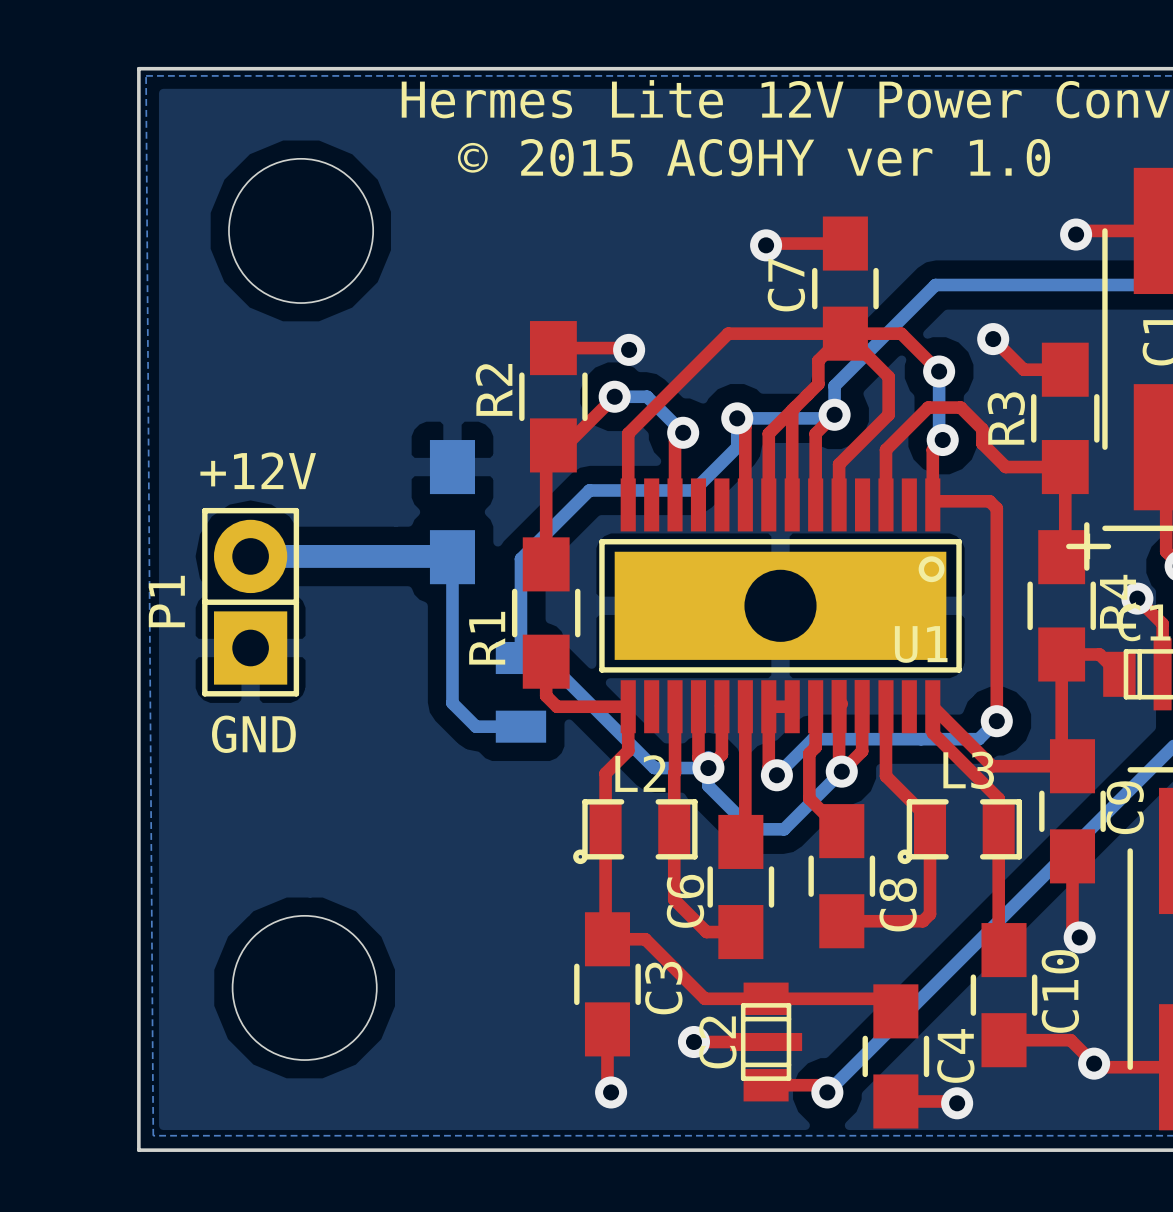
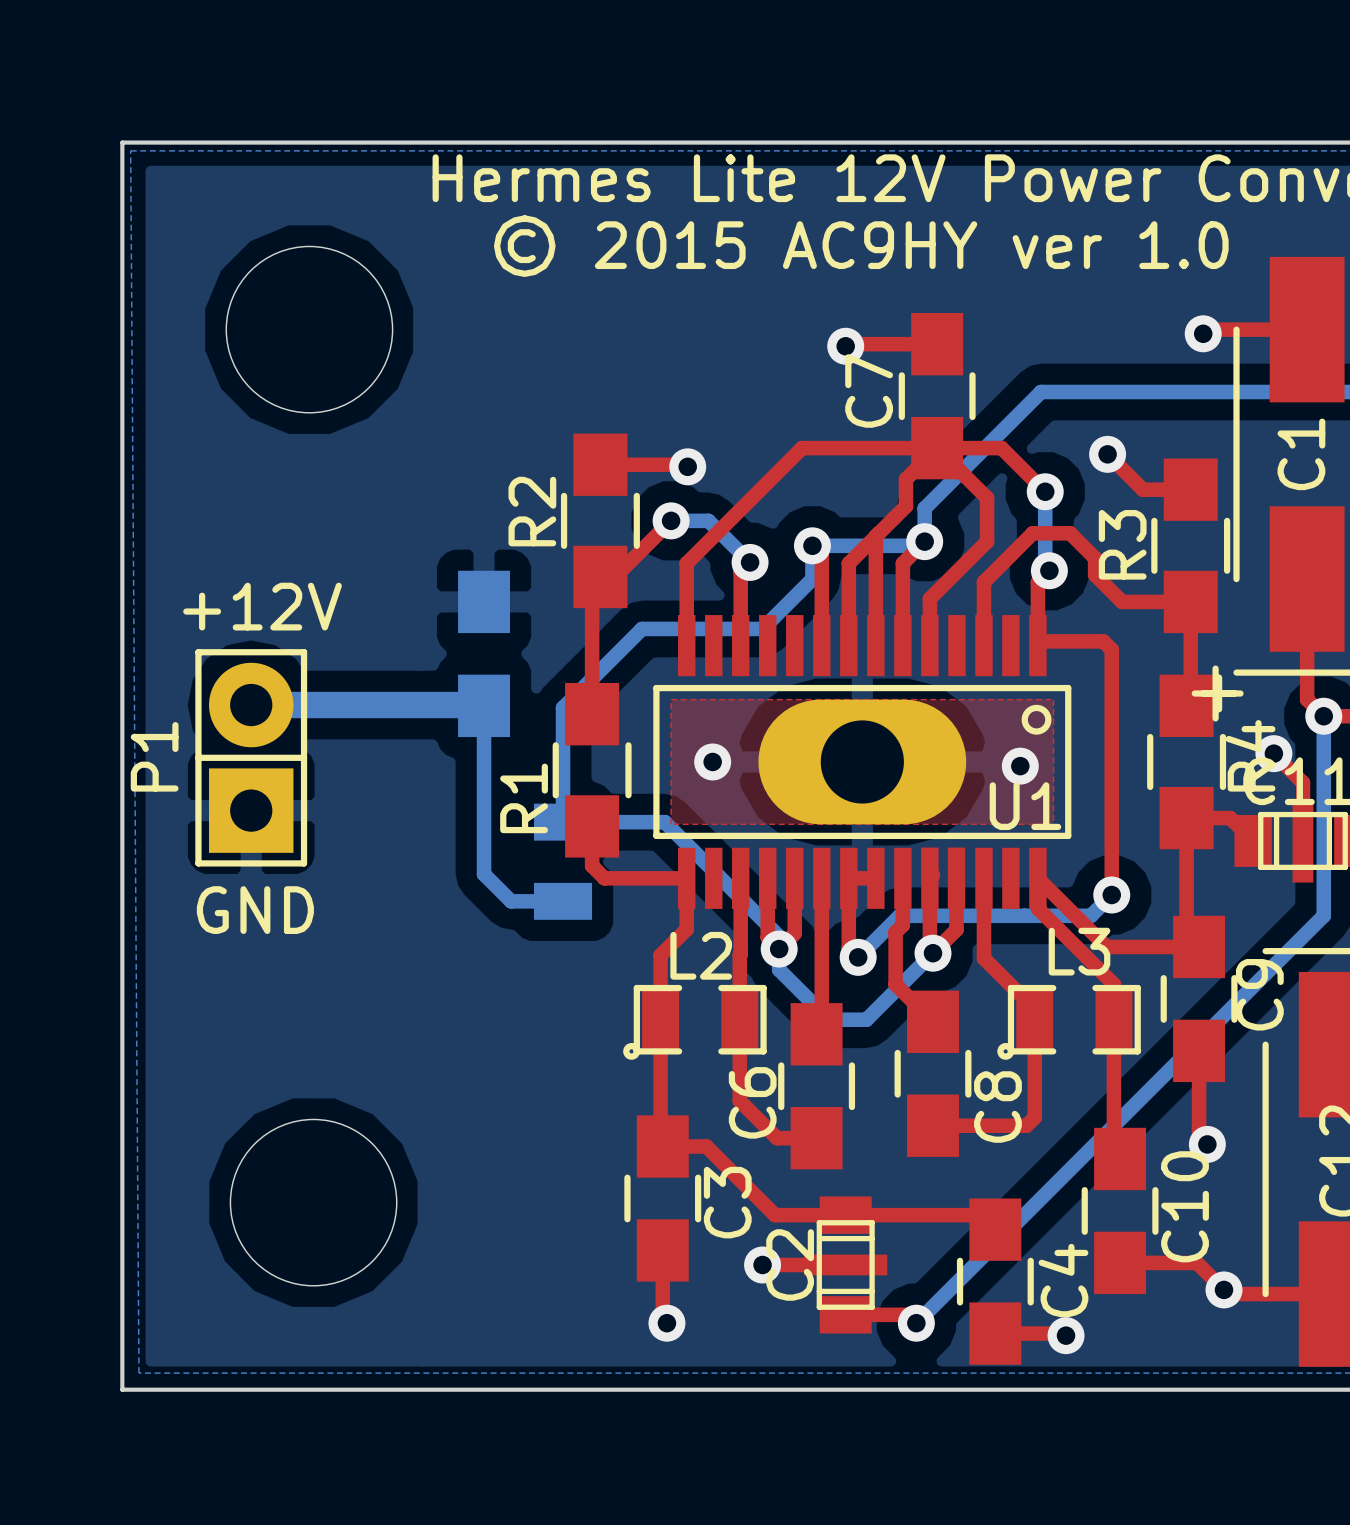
top zone outline: none -> (671, 699) (671, 824) (1053, 824) (1053, 699) (671, 699)
part footprint: [614, 551, 947, 660] -> [758, 699, 967, 825]
via: none -> (712, 761)
via: none -> (1020, 766)
bottom track: (544, 658) (654, 768) (708, 768) -> (589, 822) (664, 822) (779, 936)

